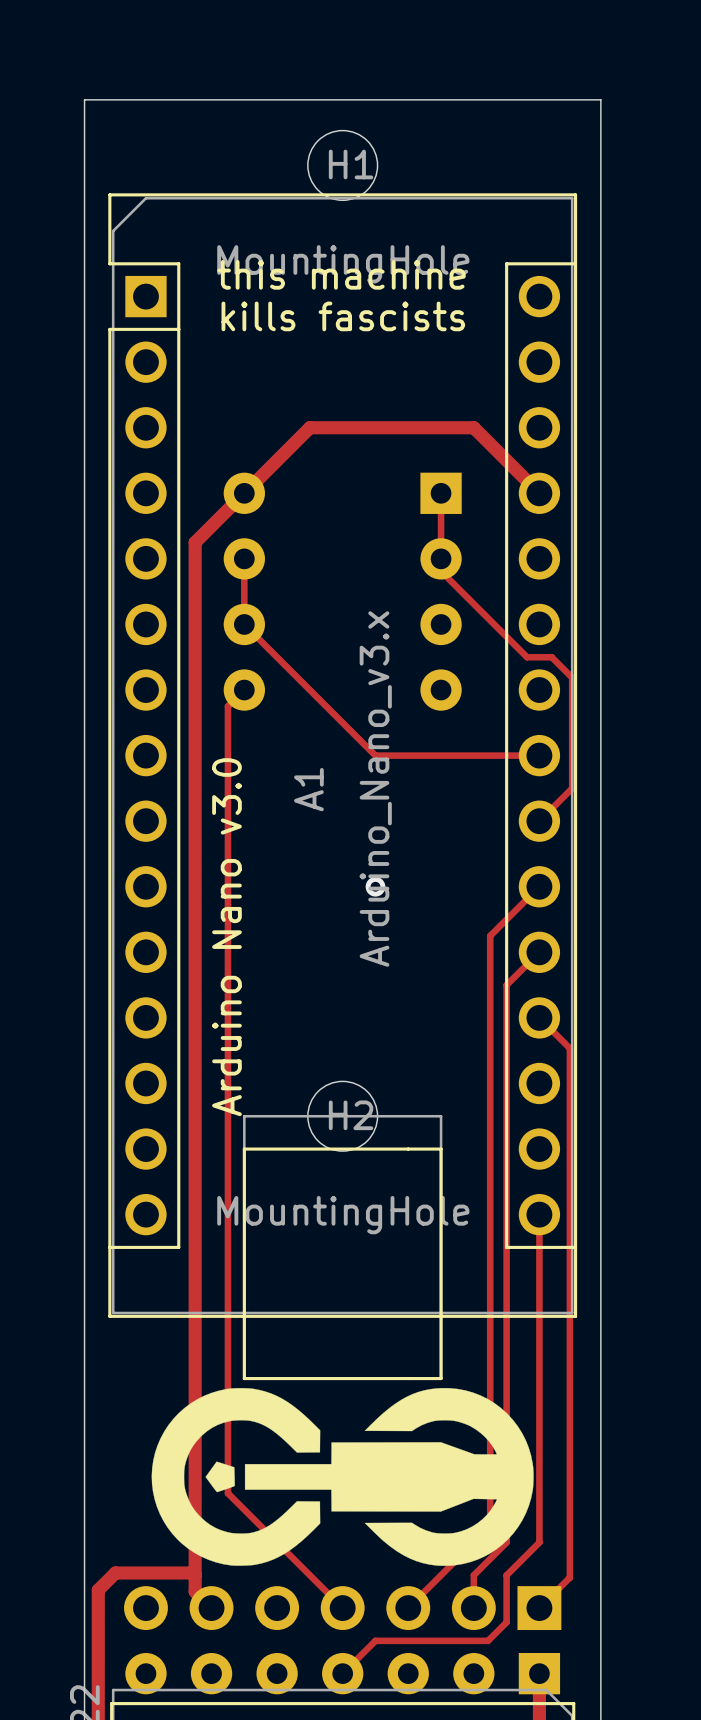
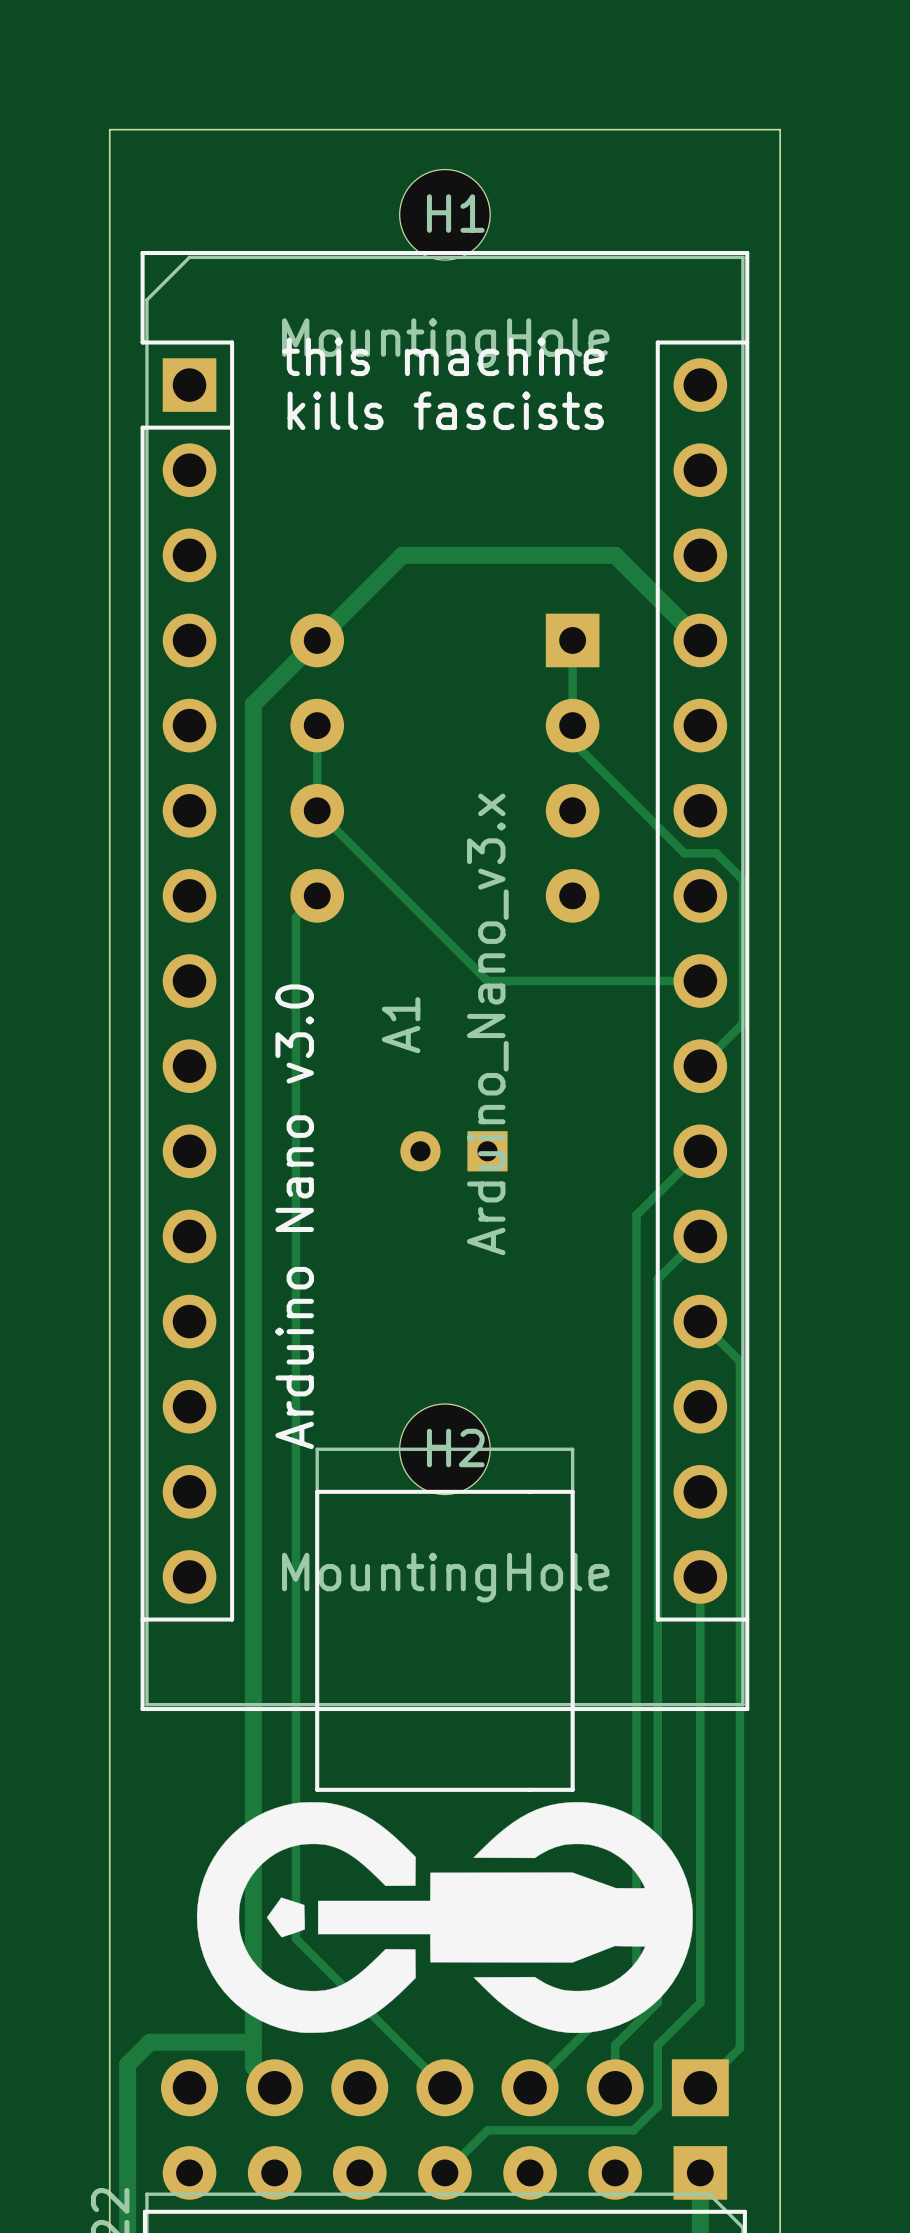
part: none -> (453, 1151)
via: (375, 886) -> none

